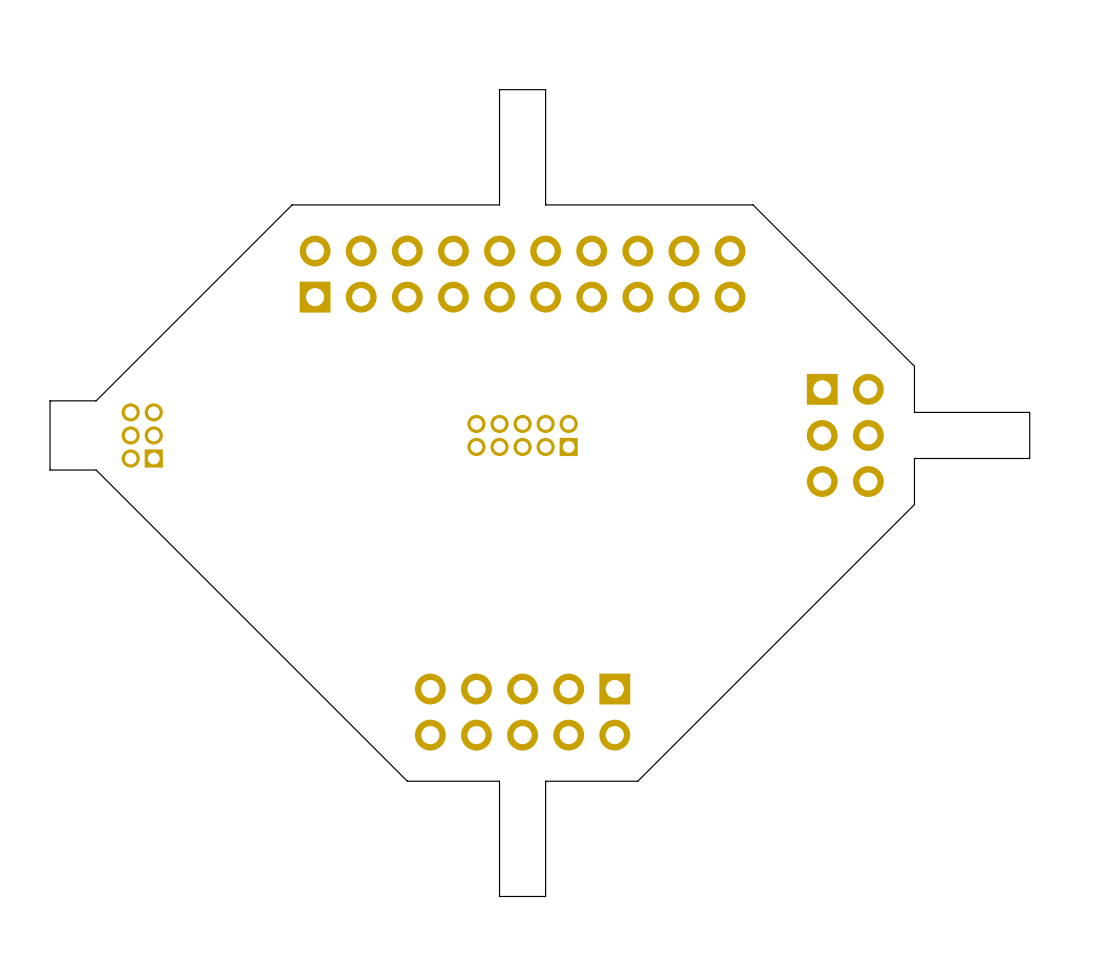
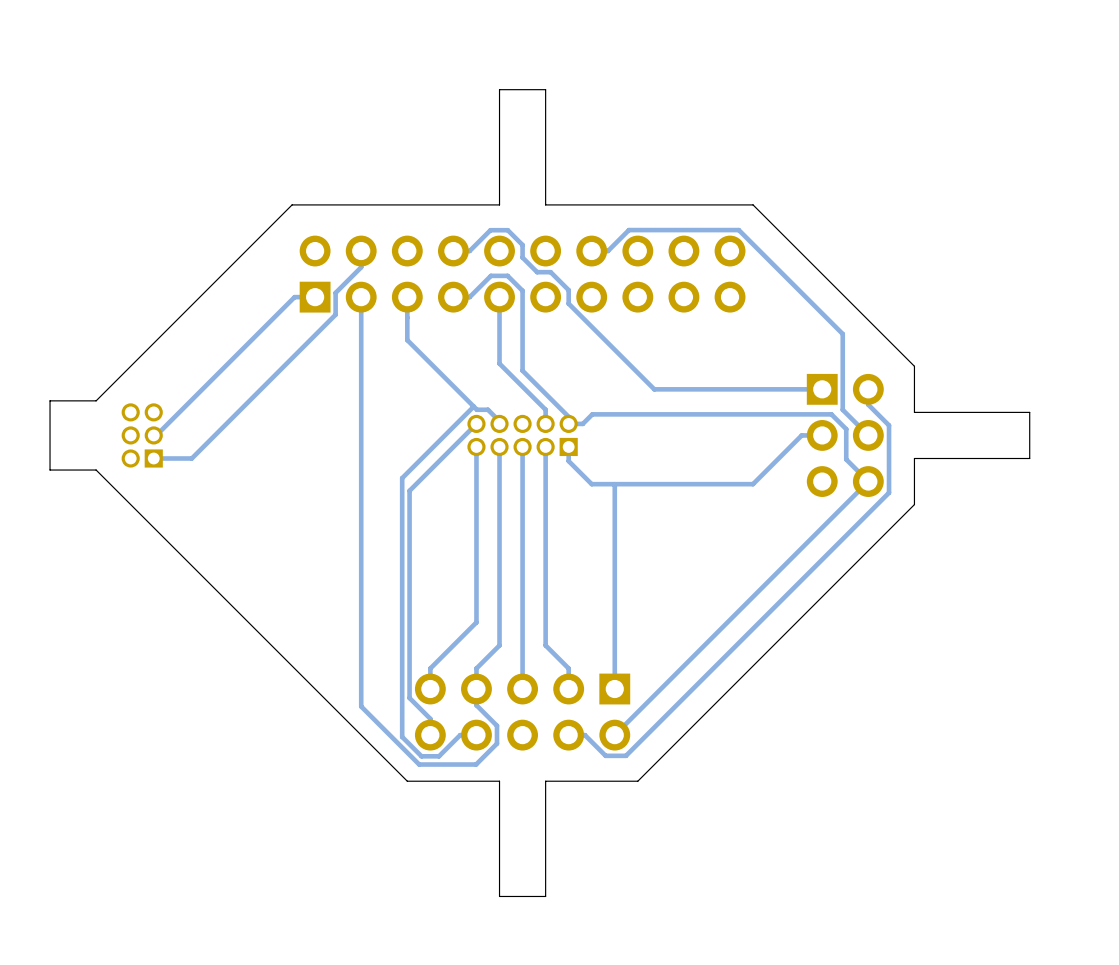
track: none -> (361, 251) (361, 267) (335, 292) (335, 314) (191, 458) (153, 458)
track: none -> (453, 251) (469, 251) (490, 230) (507, 230) (522, 245) (522, 257) (537, 272) (550, 272) (568, 290) (568, 303) (654, 389) (822, 389)
track: none -> (591, 251) (607, 251) (628, 230) (738, 230) (842, 334) (842, 409) (868, 435)
track: none -> (315, 297) (294, 297) (156, 435) (153, 435)
track: none -> (361, 297) (361, 706) (419, 764) (476, 764) (497, 743) (497, 725) (476, 705) (476, 668) (499, 645) (499, 446)
track: none -> (407, 297) (407, 340) (476, 409) (488, 409) (499, 421) (499, 423)
track: none -> (453, 297) (469, 297) (490, 275) (507, 275) (522, 290) (522, 370) (575, 423)
track: none -> (499, 297) (499, 363) (545, 409) (545, 423)
track: none -> (868, 389) (868, 404) (889, 425) (889, 492) (625, 755) (605, 755) (584, 735) (568, 735)
track: none -> (473, 406) (402, 478) (402, 736) (421, 756) (439, 756) (460, 735) (476, 735)
track: none -> (476, 423) (409, 490) (409, 698) (430, 718) (430, 735)
track: none -> (568, 423) (582, 423) (592, 414) (831, 414) (846, 429) (846, 459) (868, 481) (614, 735)
track: none -> (822, 435) (801, 435) (753, 484) (591, 484) (568, 461) (568, 446)
track: none -> (476, 446) (476, 622) (430, 668) (430, 689)
track: none -> (522, 446) (522, 689)
track: none -> (545, 446) (545, 645) (568, 668) (568, 689)
track: none -> (614, 484) (614, 689)

